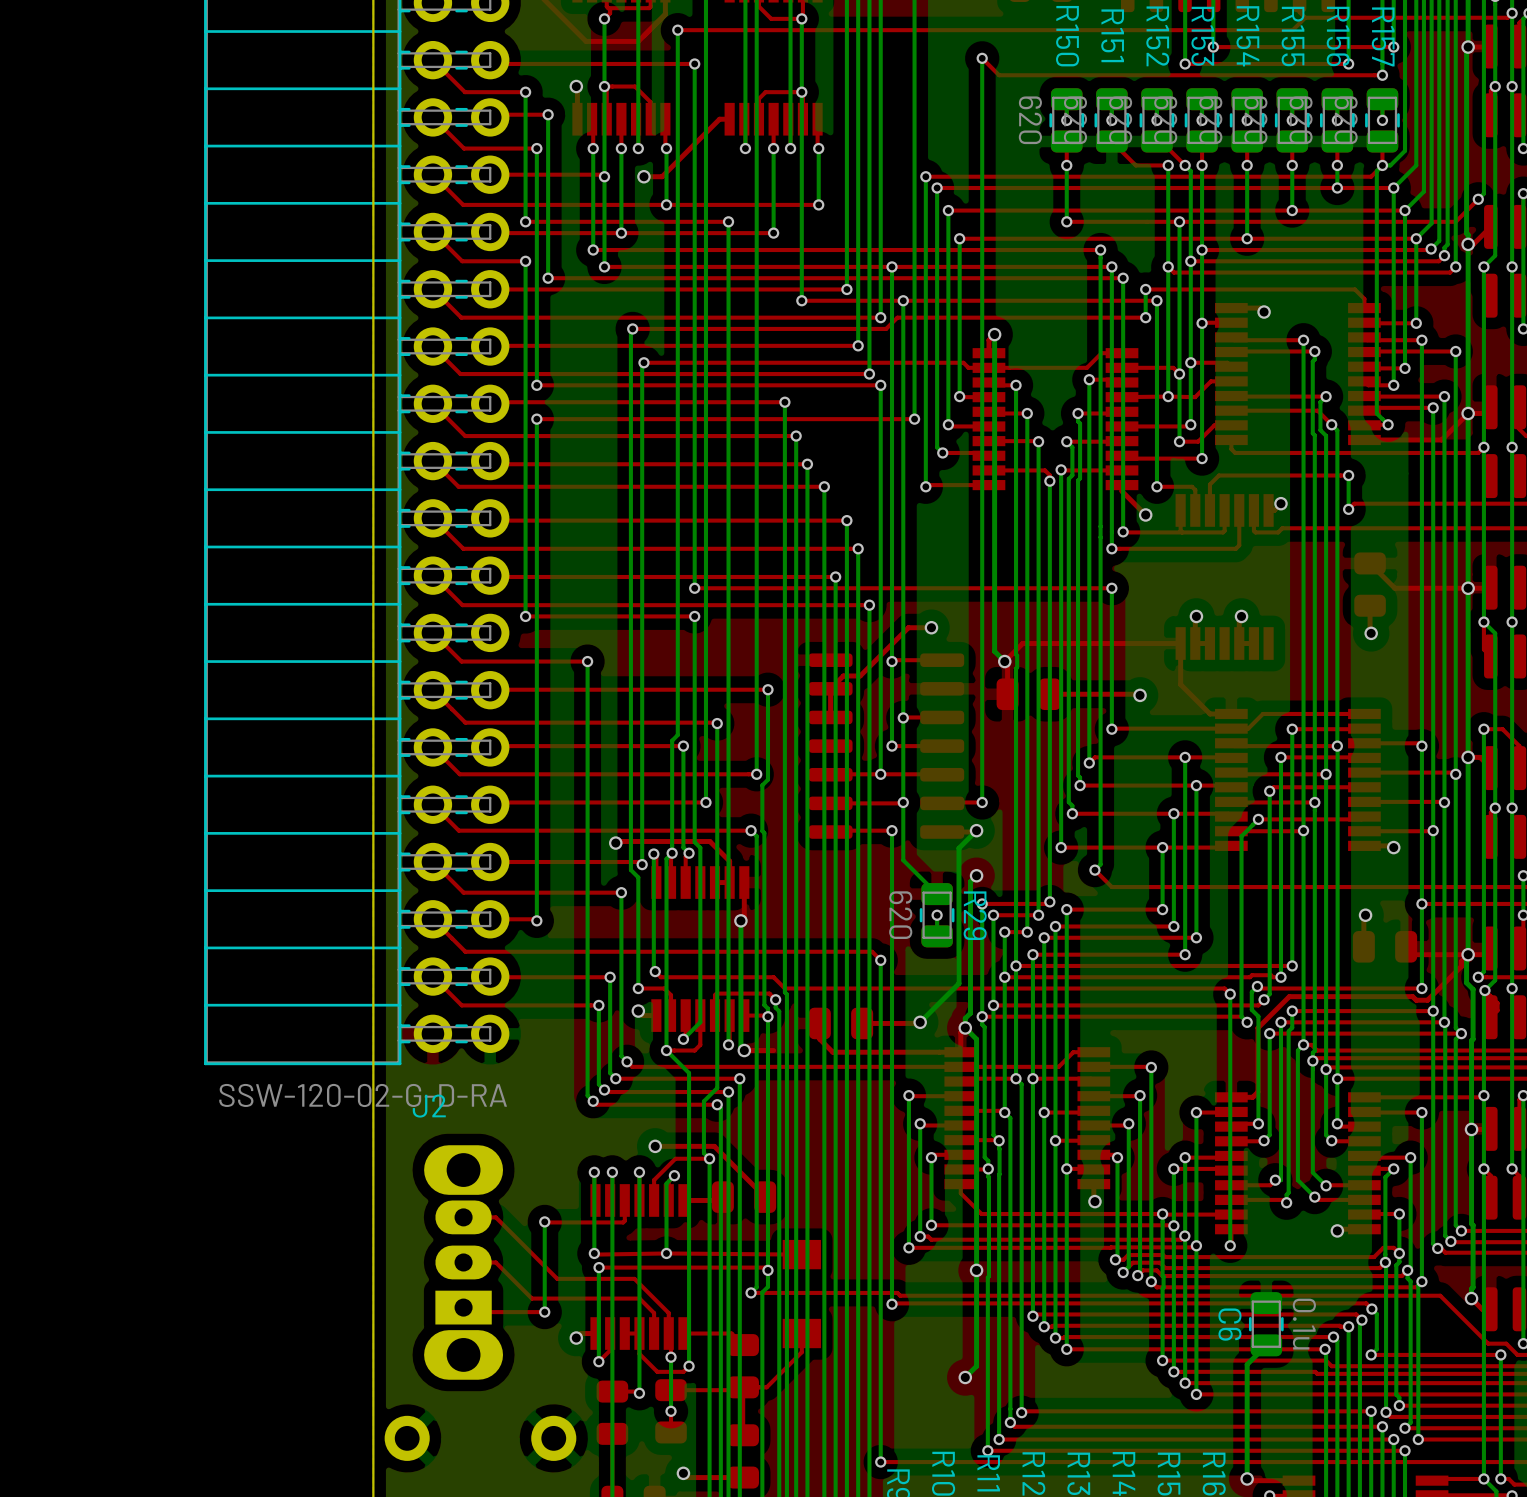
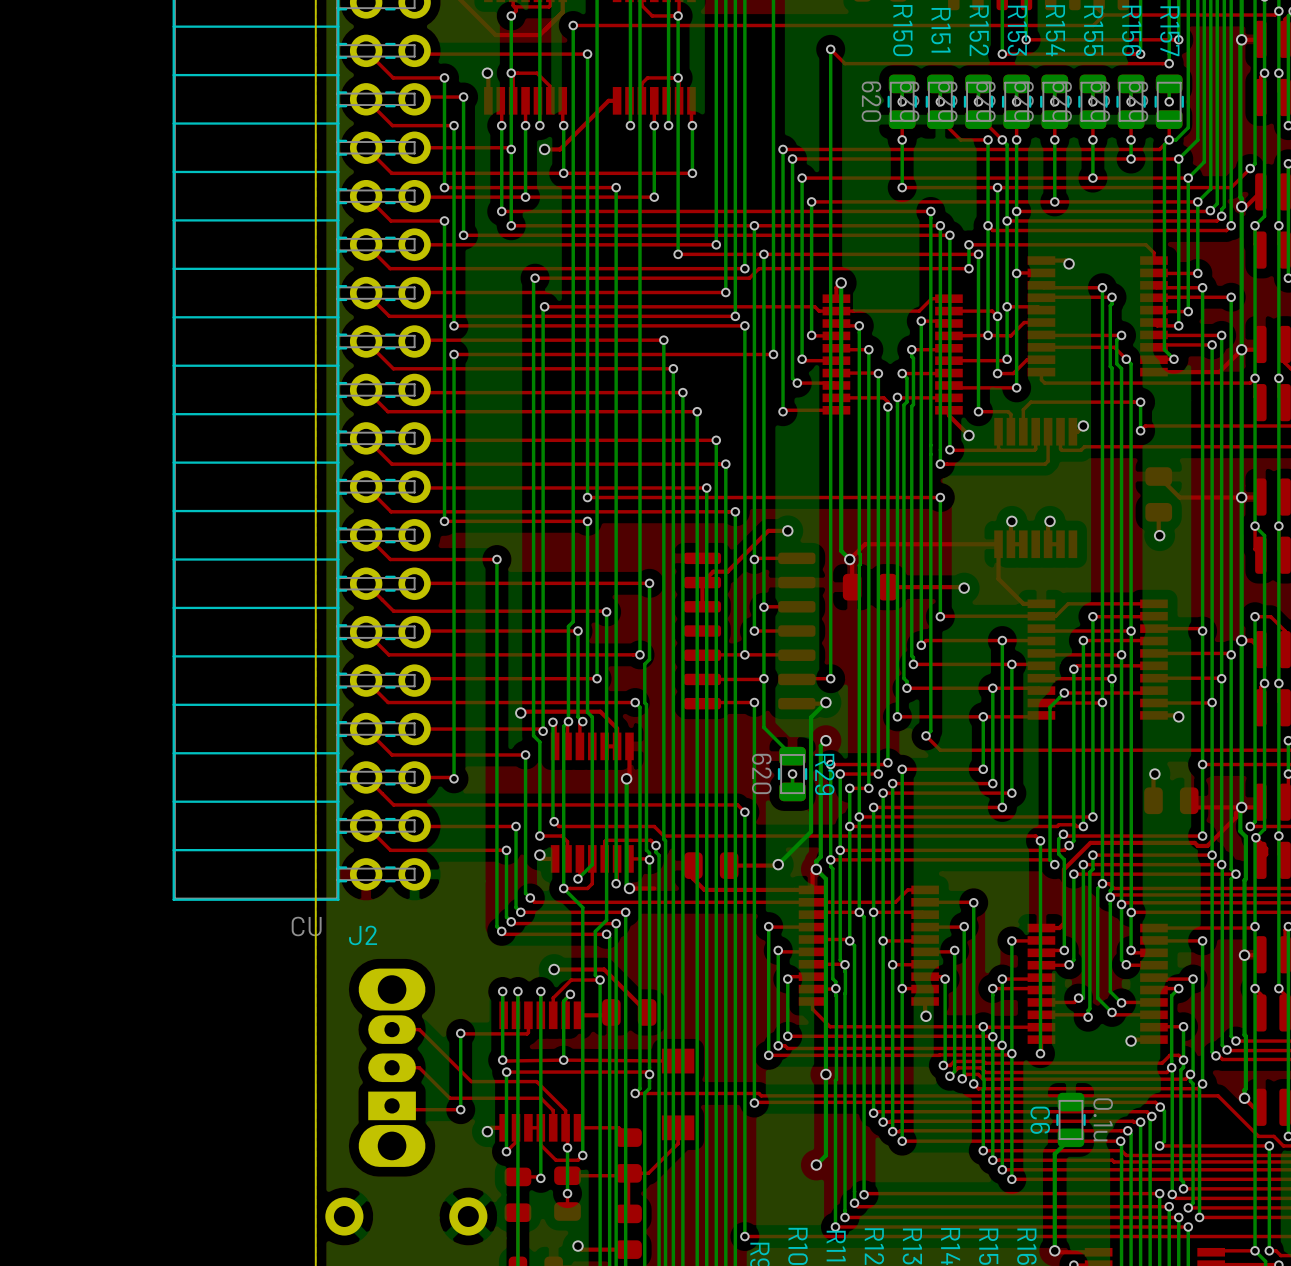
J2 value: SSW-120-02-G-D-RA (363, 1095) -> CU (306, 926)

